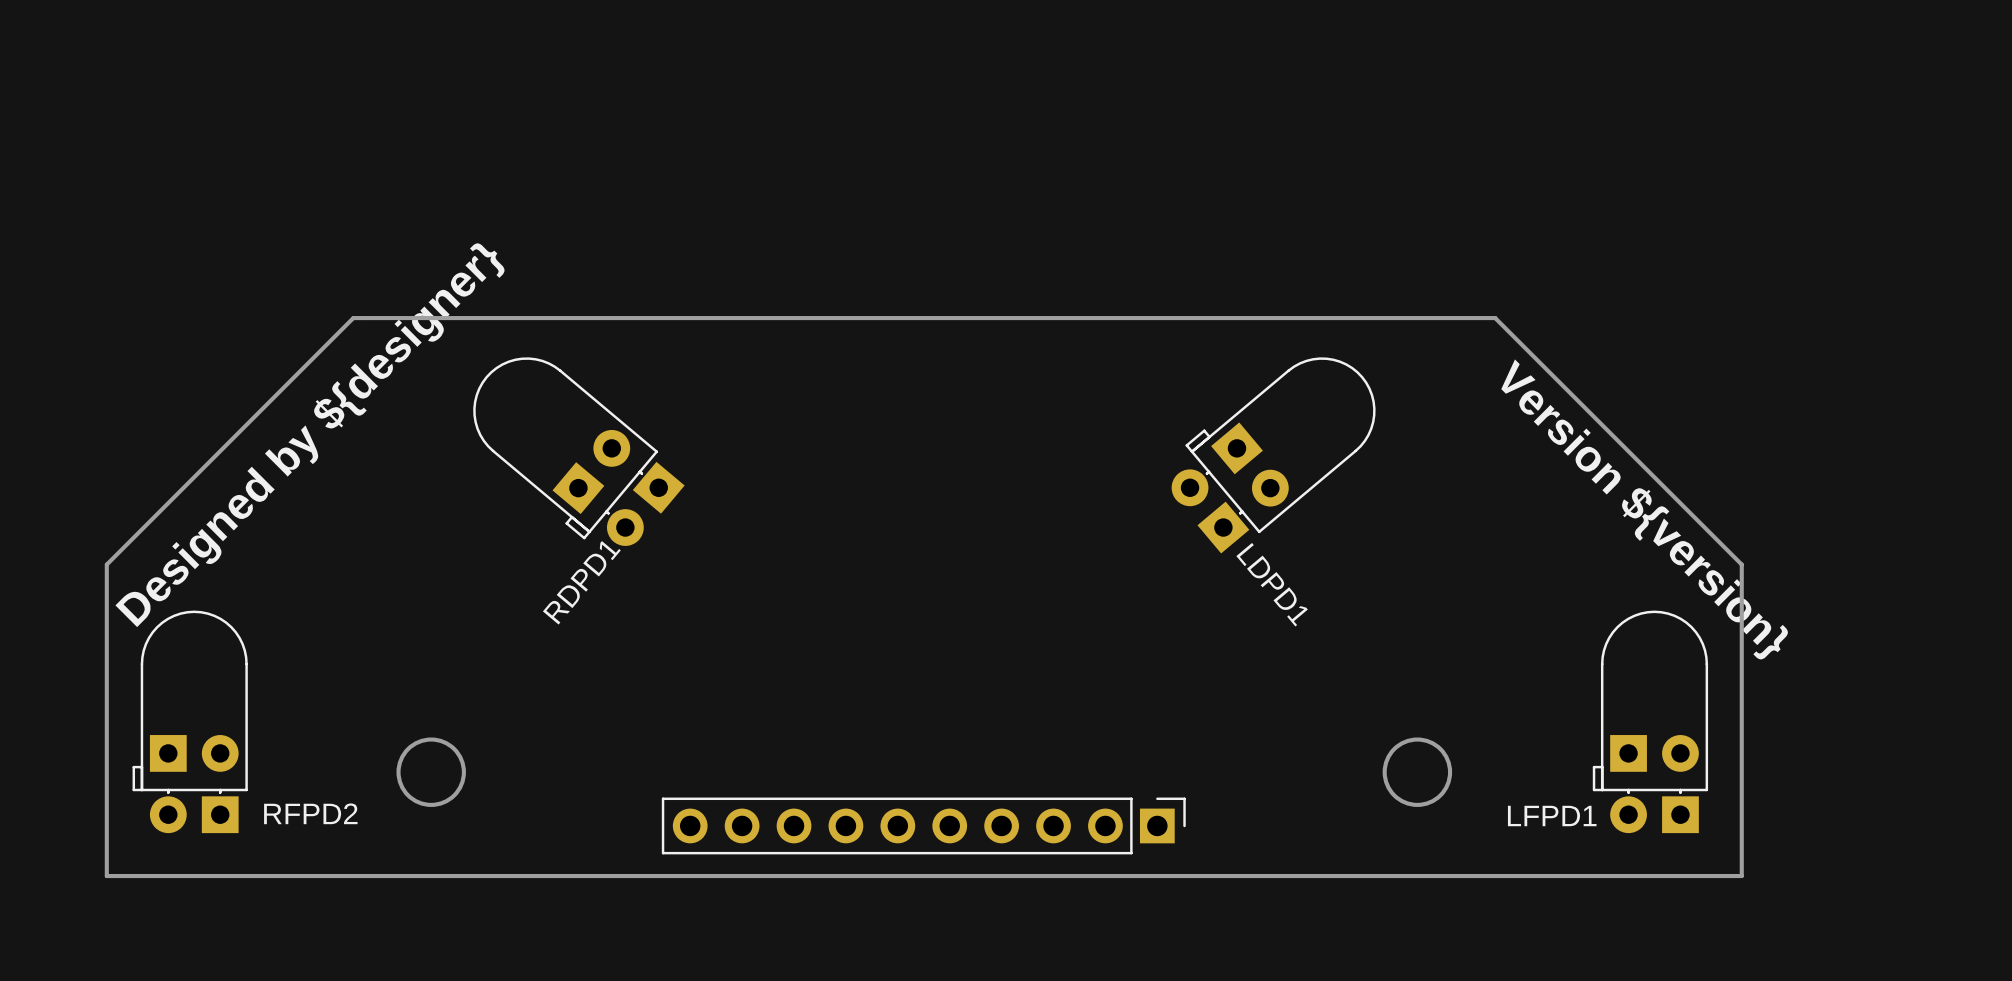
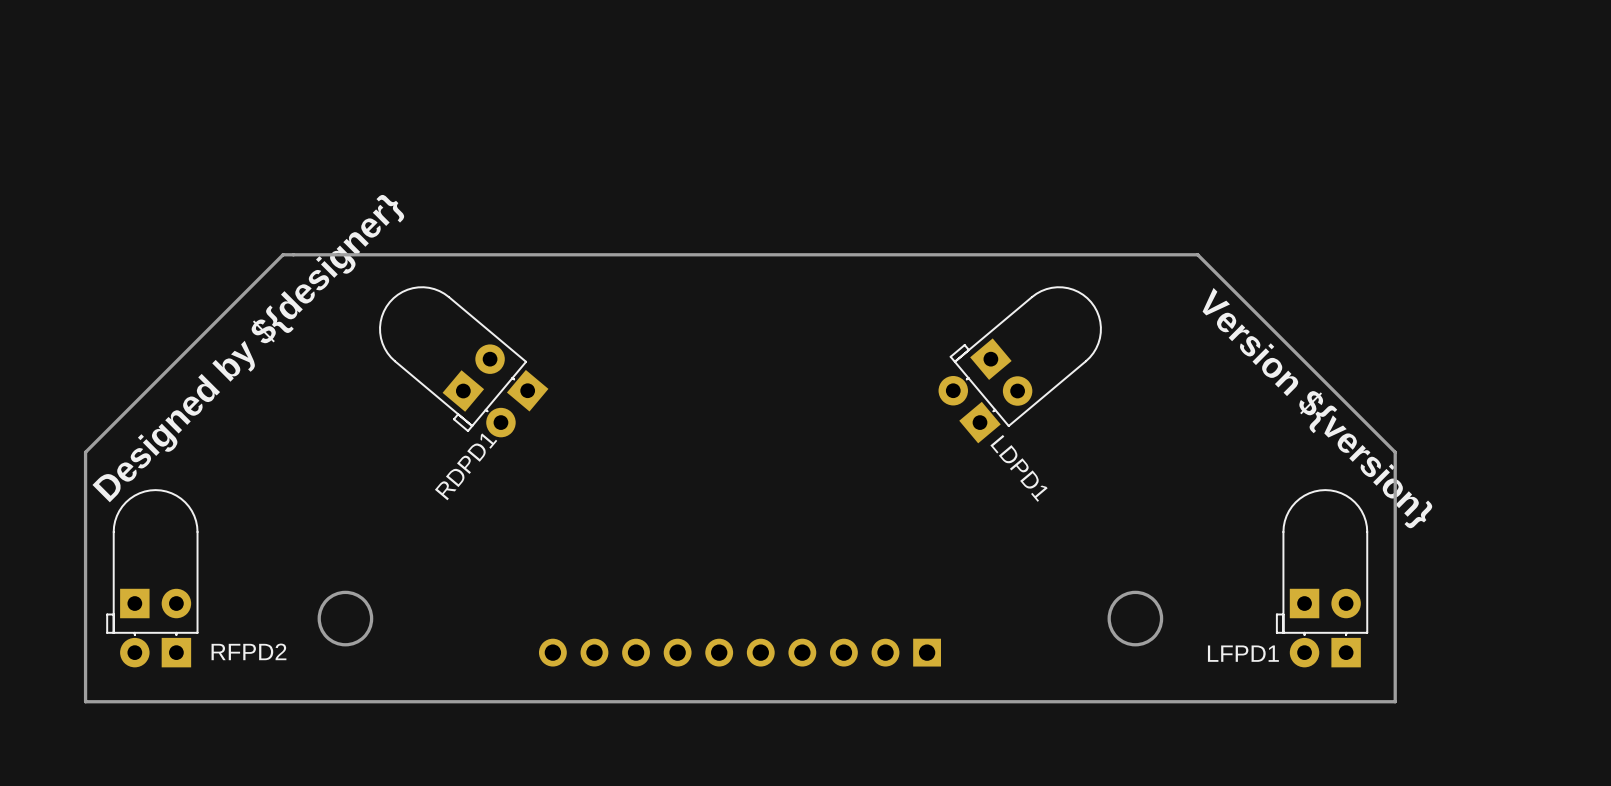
part side: bottom (923, 825) -> top (739, 652)

